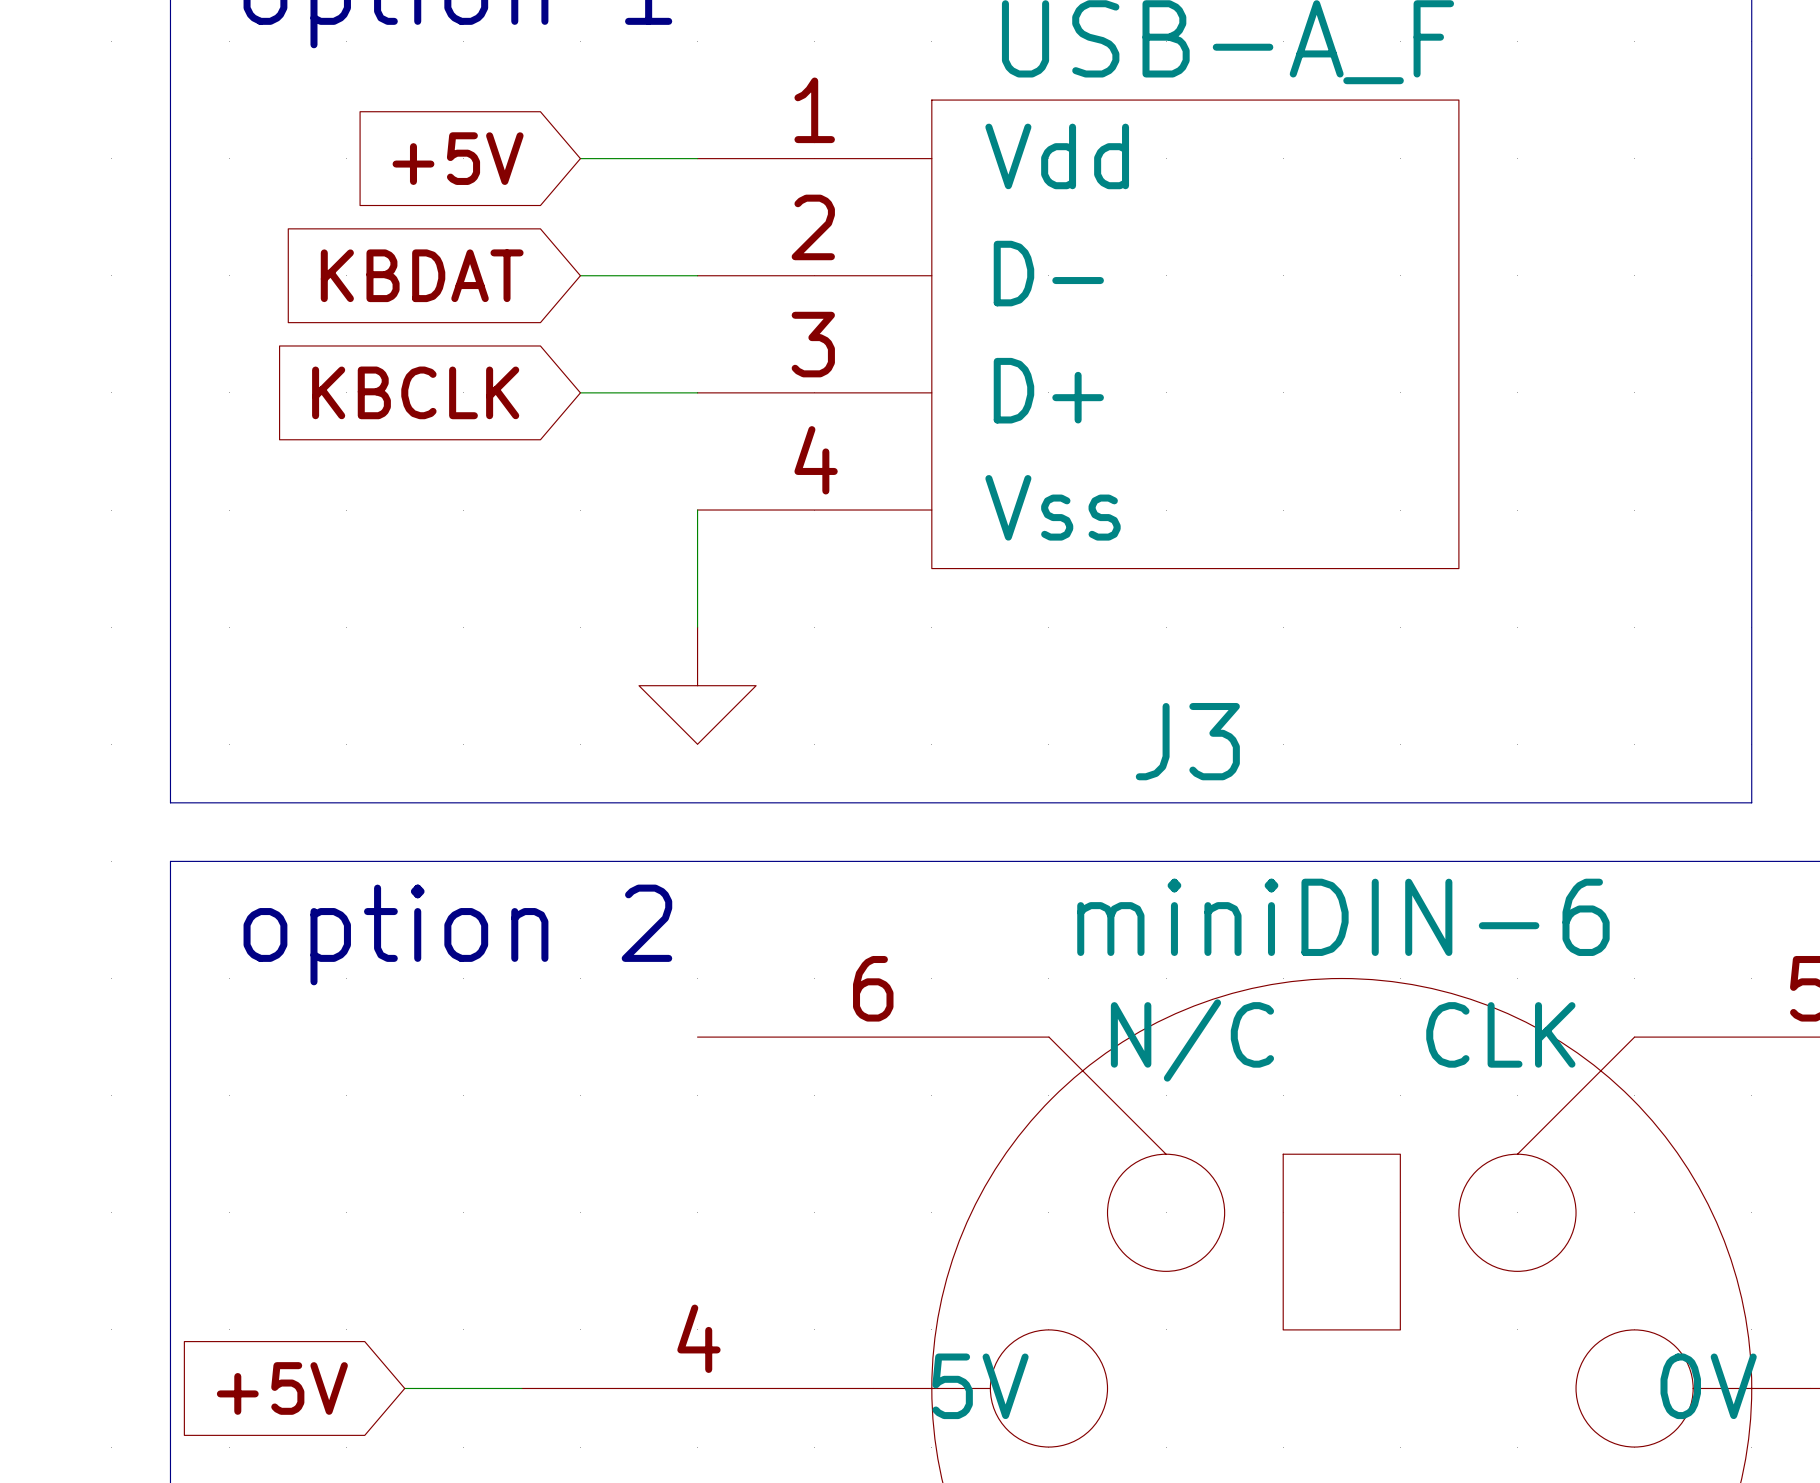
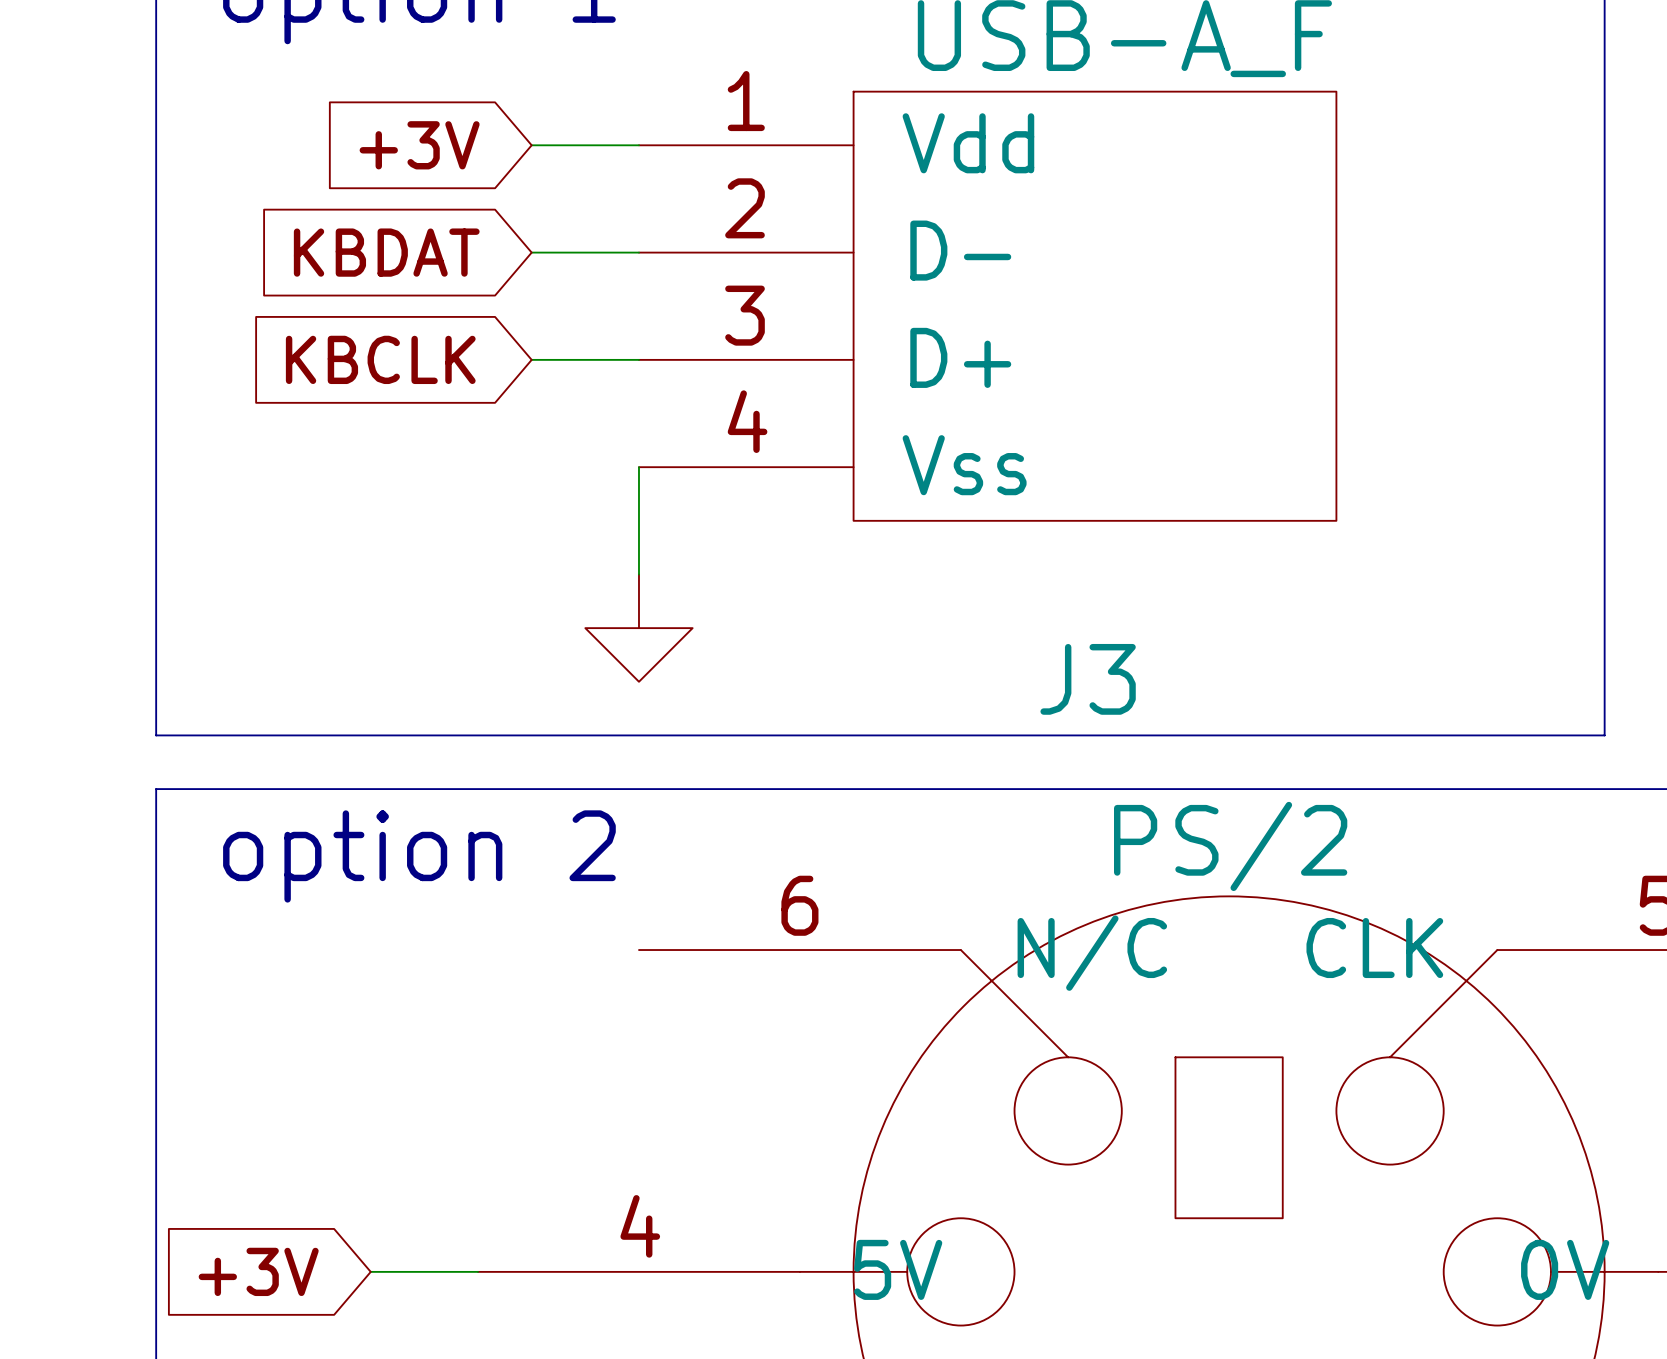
global label: +5V (458, 158) -> +3V (419, 145)
part value: miniDIN-6 (1343, 917) -> PS/2 (1230, 846)
global label: +5V (282, 1388) -> +3V (258, 1271)

